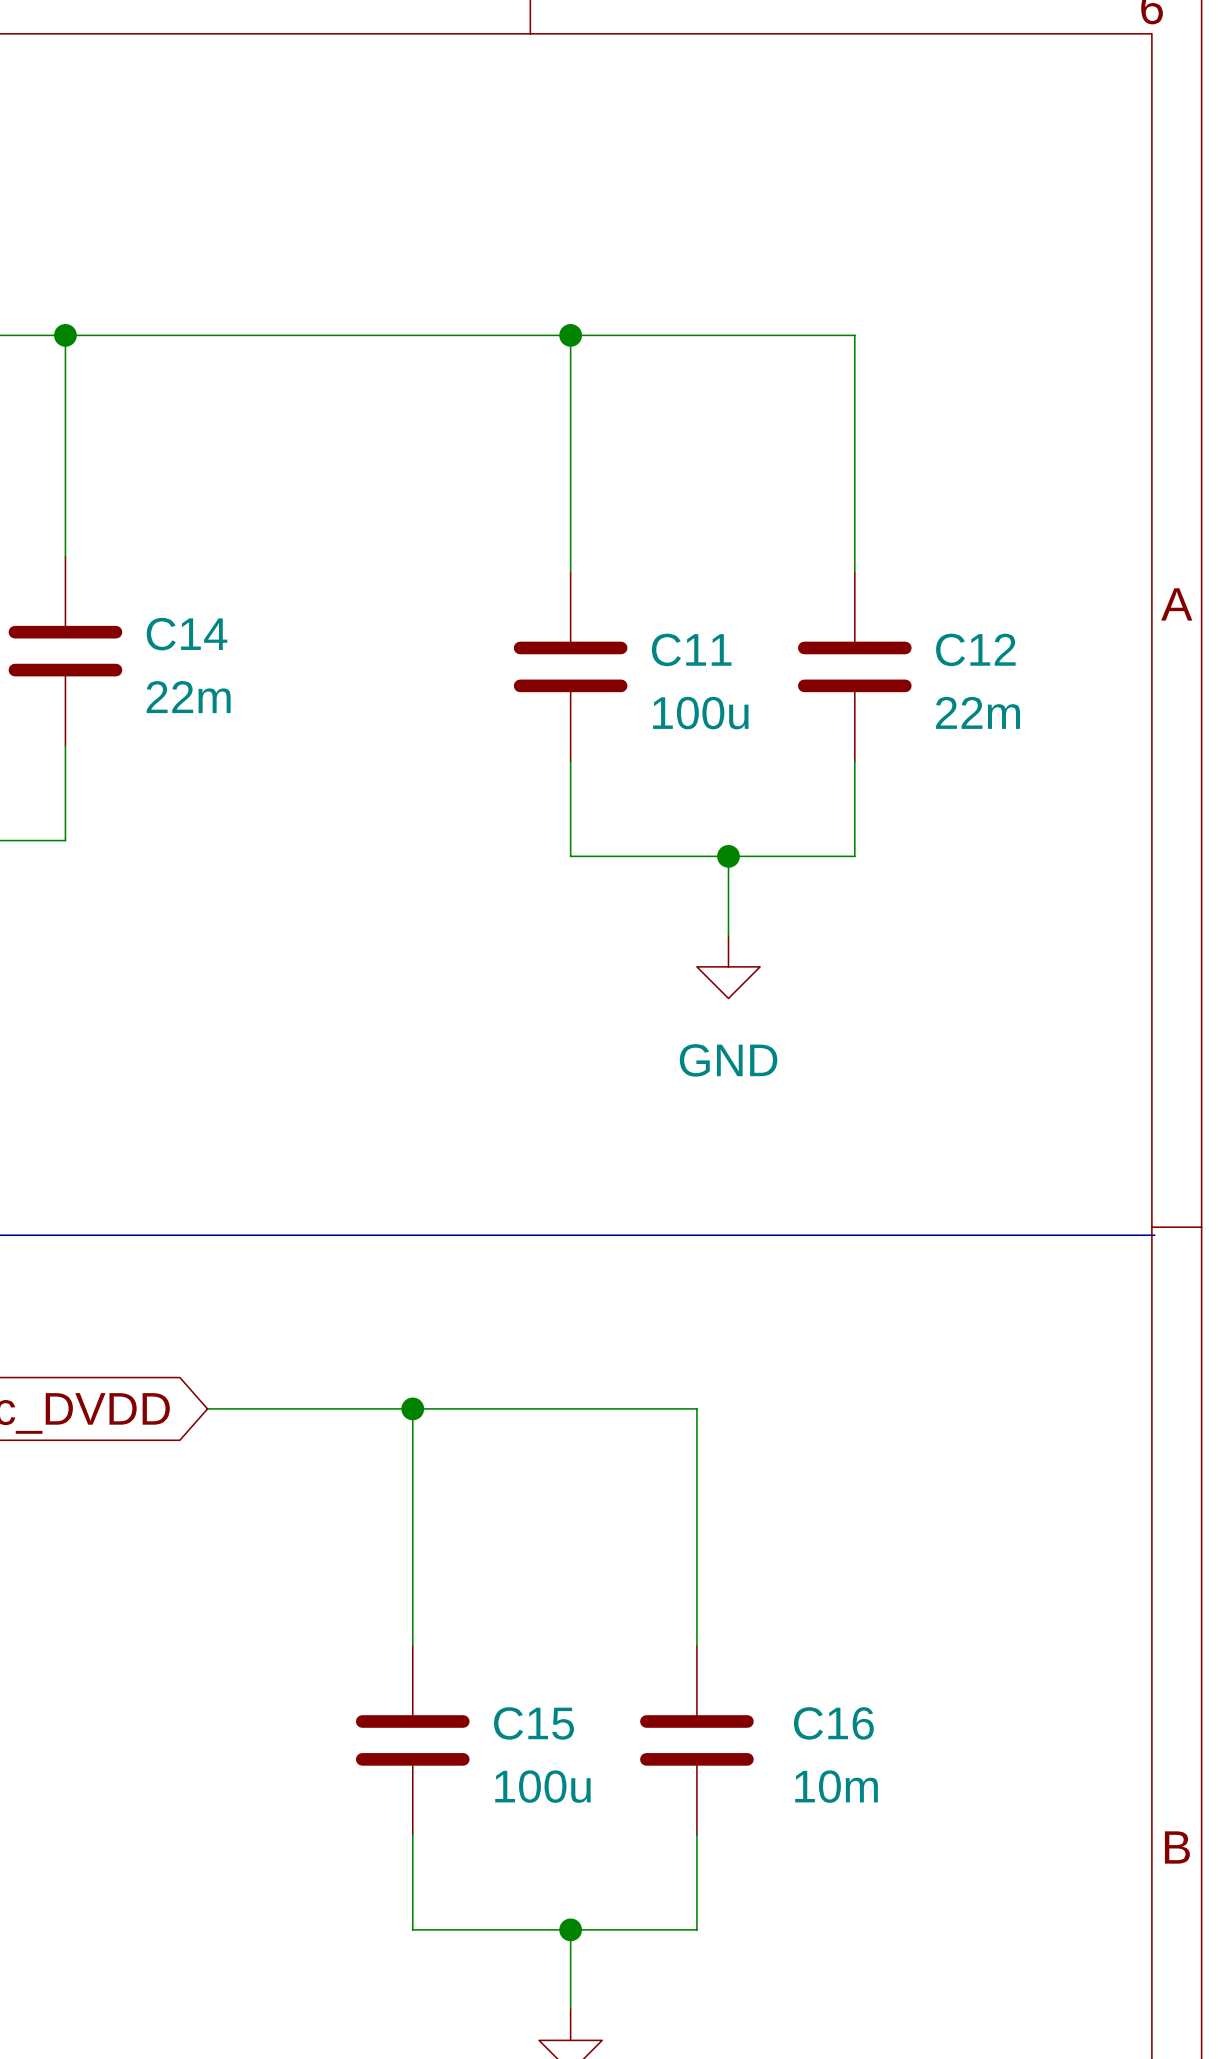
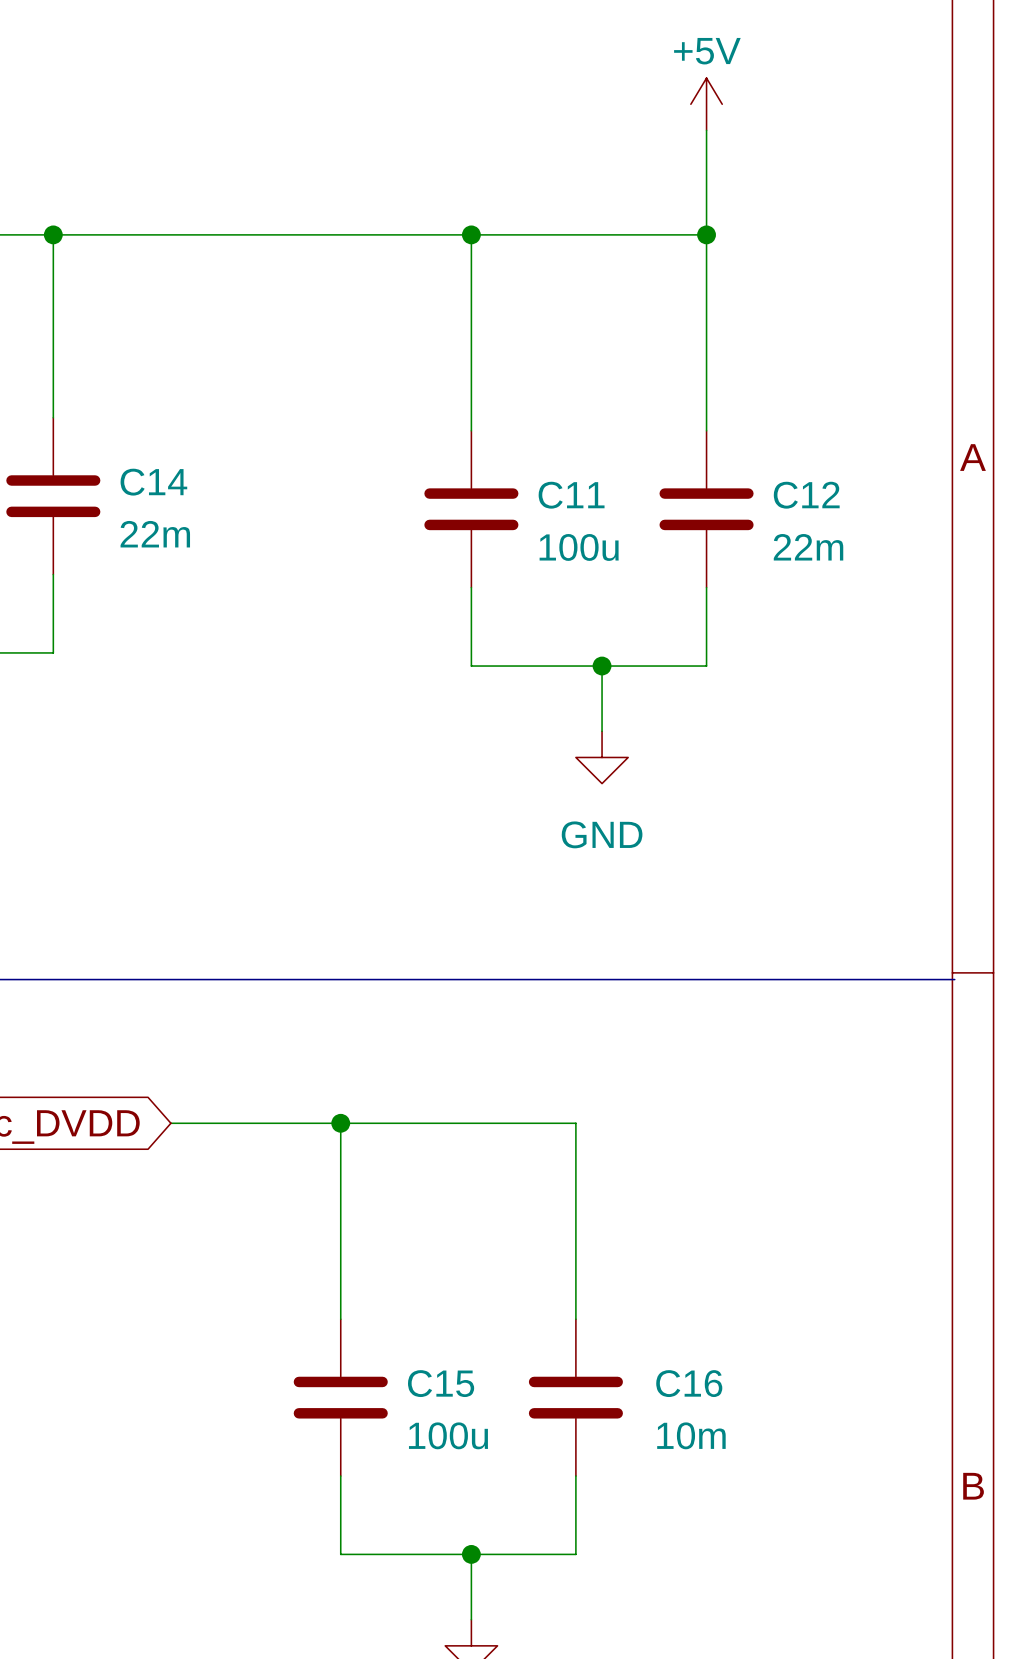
power symbol: none -> +5V (706, 104)
wire: none -> (706, 130) (706, 234)
junction: none -> (706, 234)

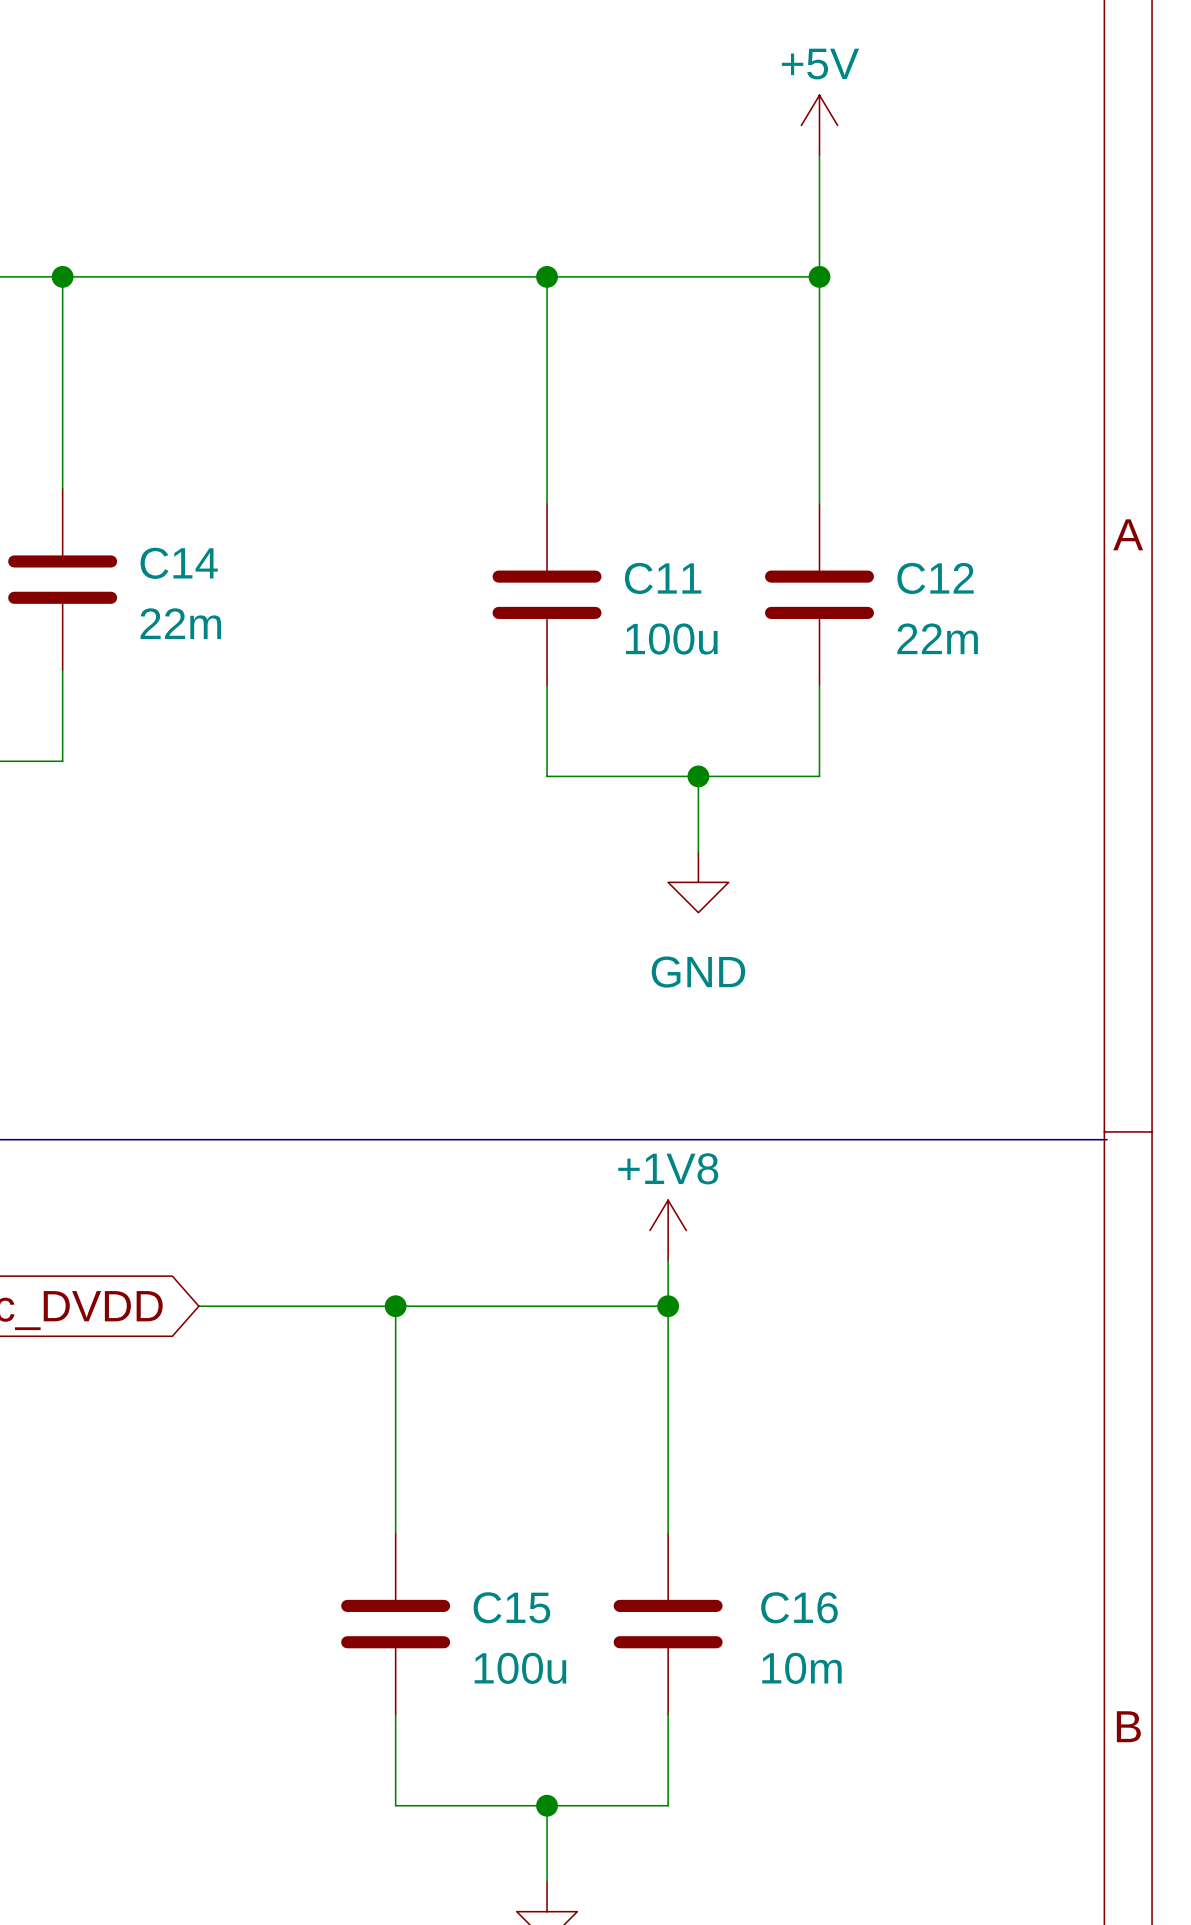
power symbol: none -> +1V8 (668, 1230)
wire: none -> (668, 1260) (668, 1306)
junction: none -> (668, 1306)

